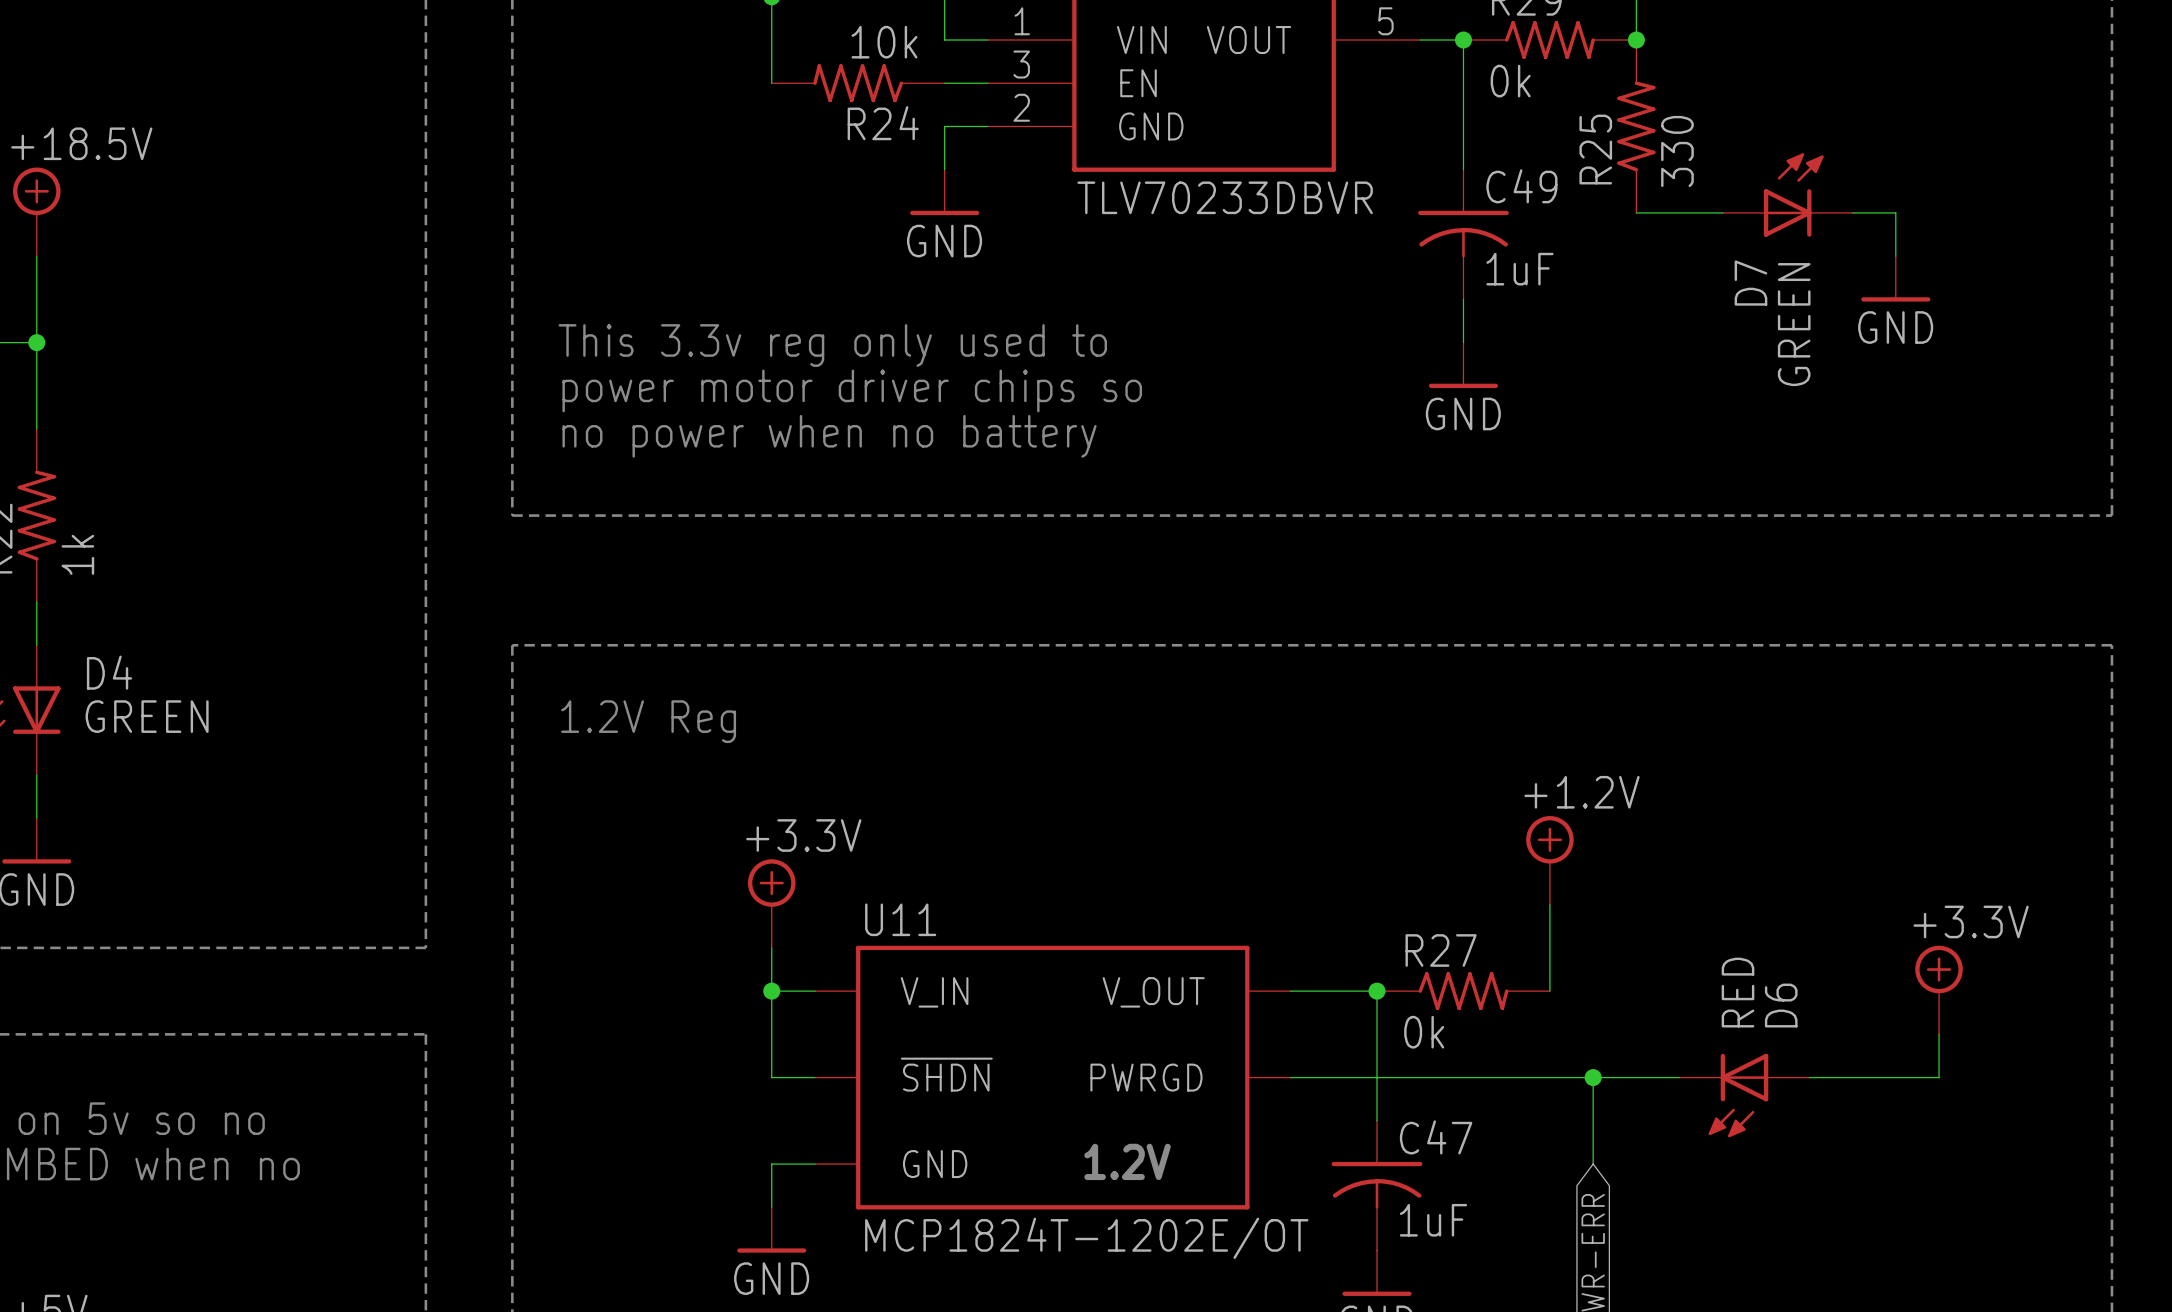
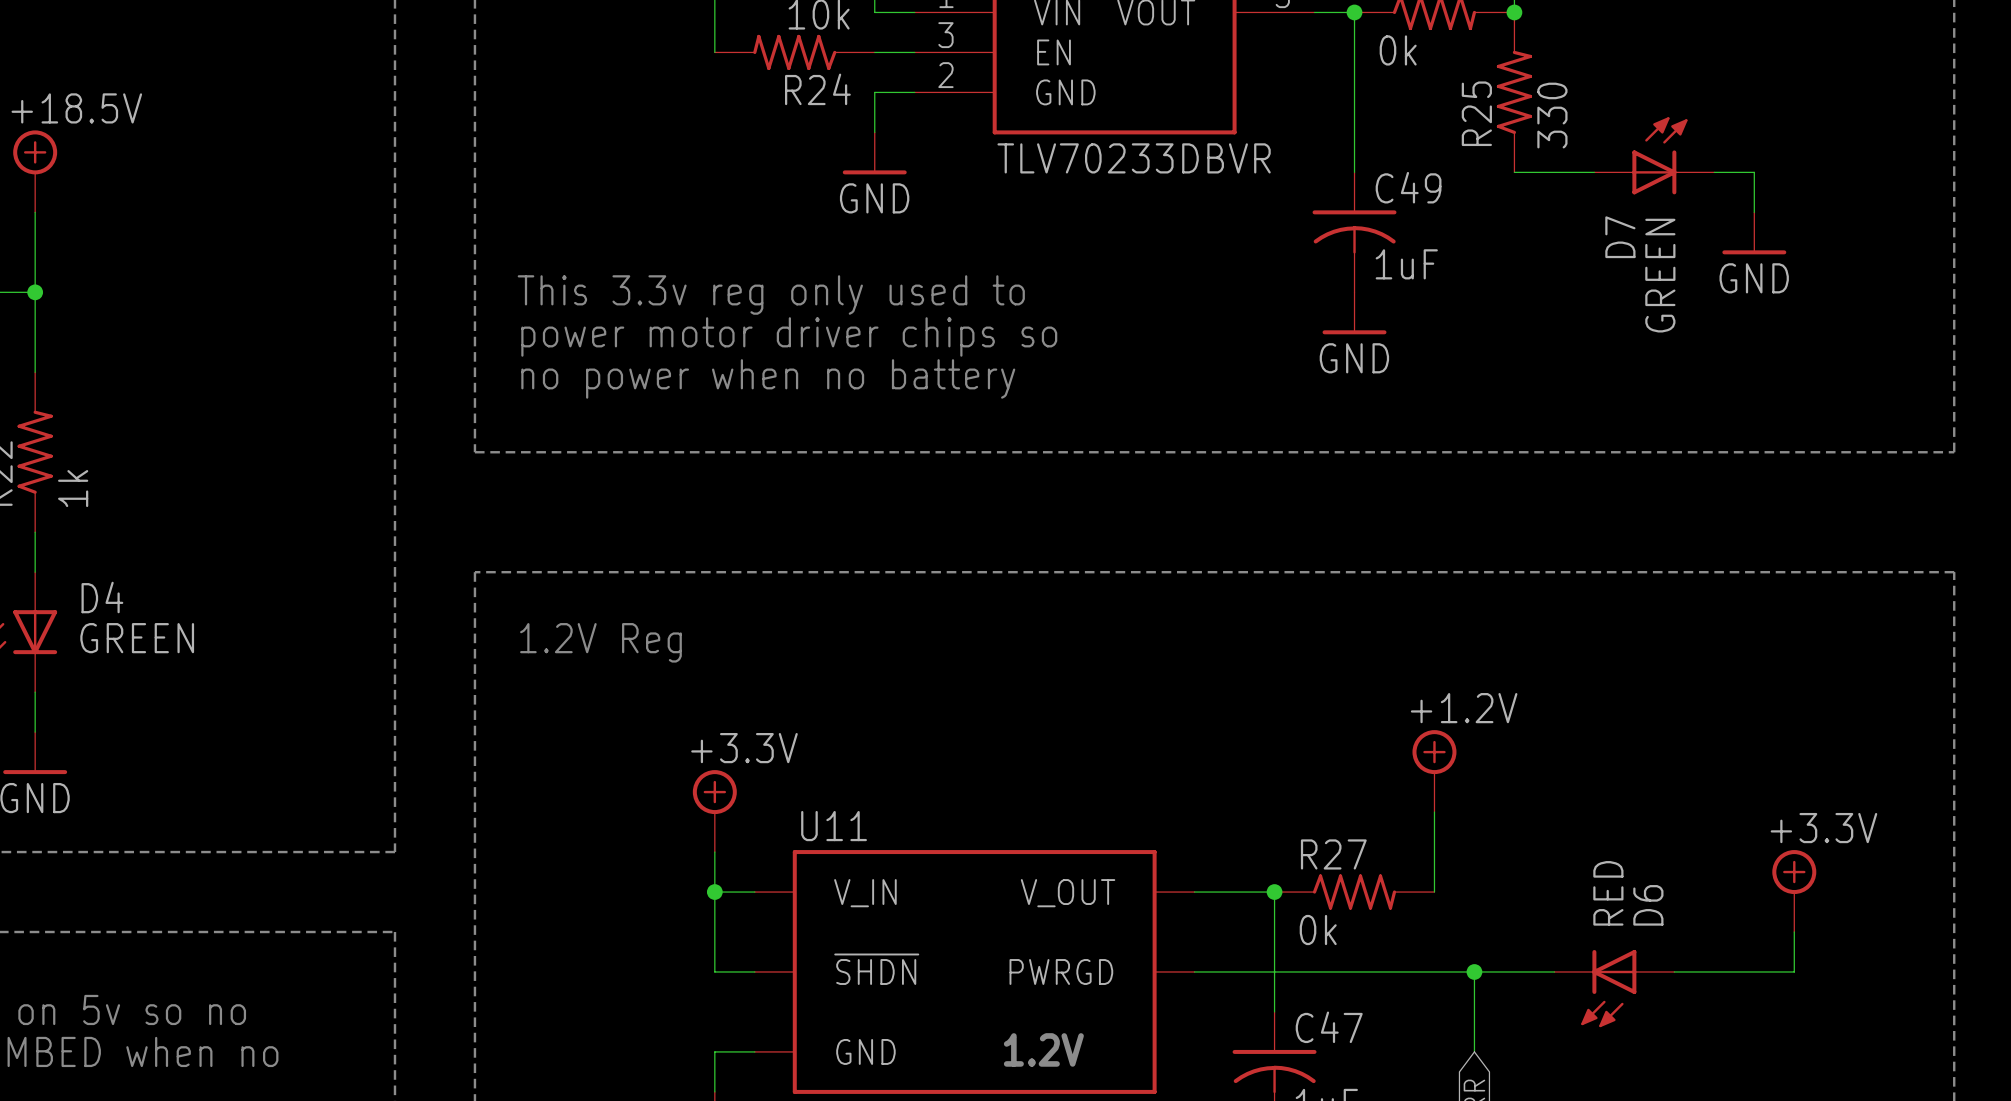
C49 position: (1463, 234) -> (1354, 232)

